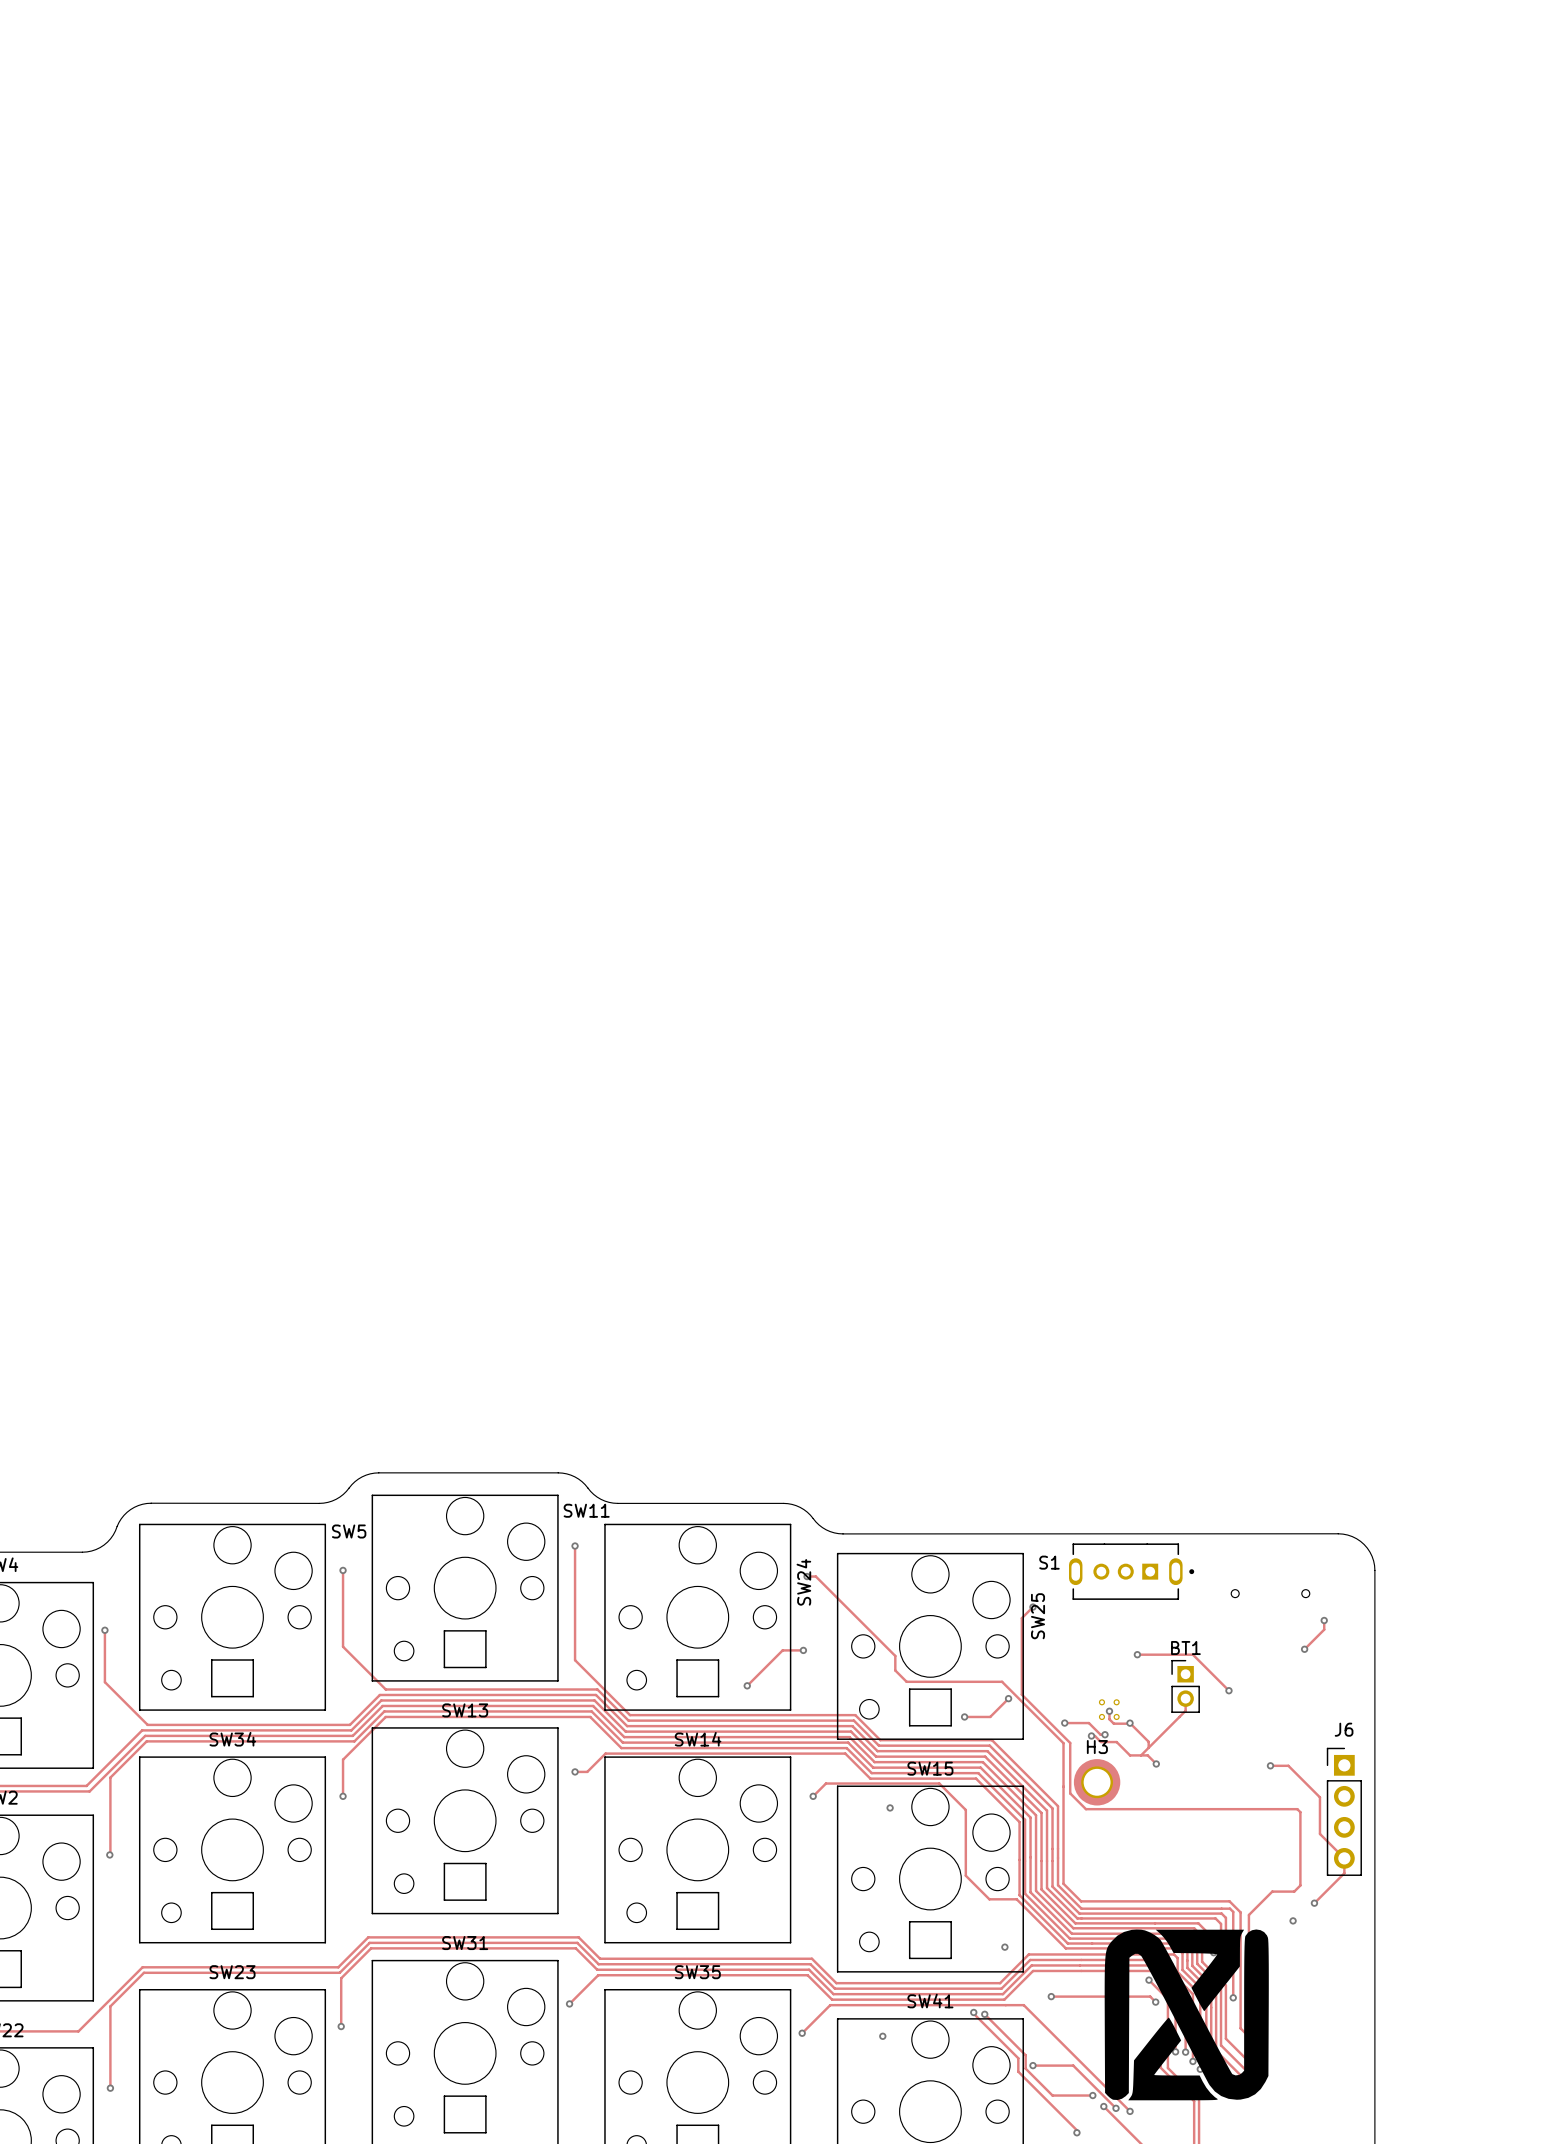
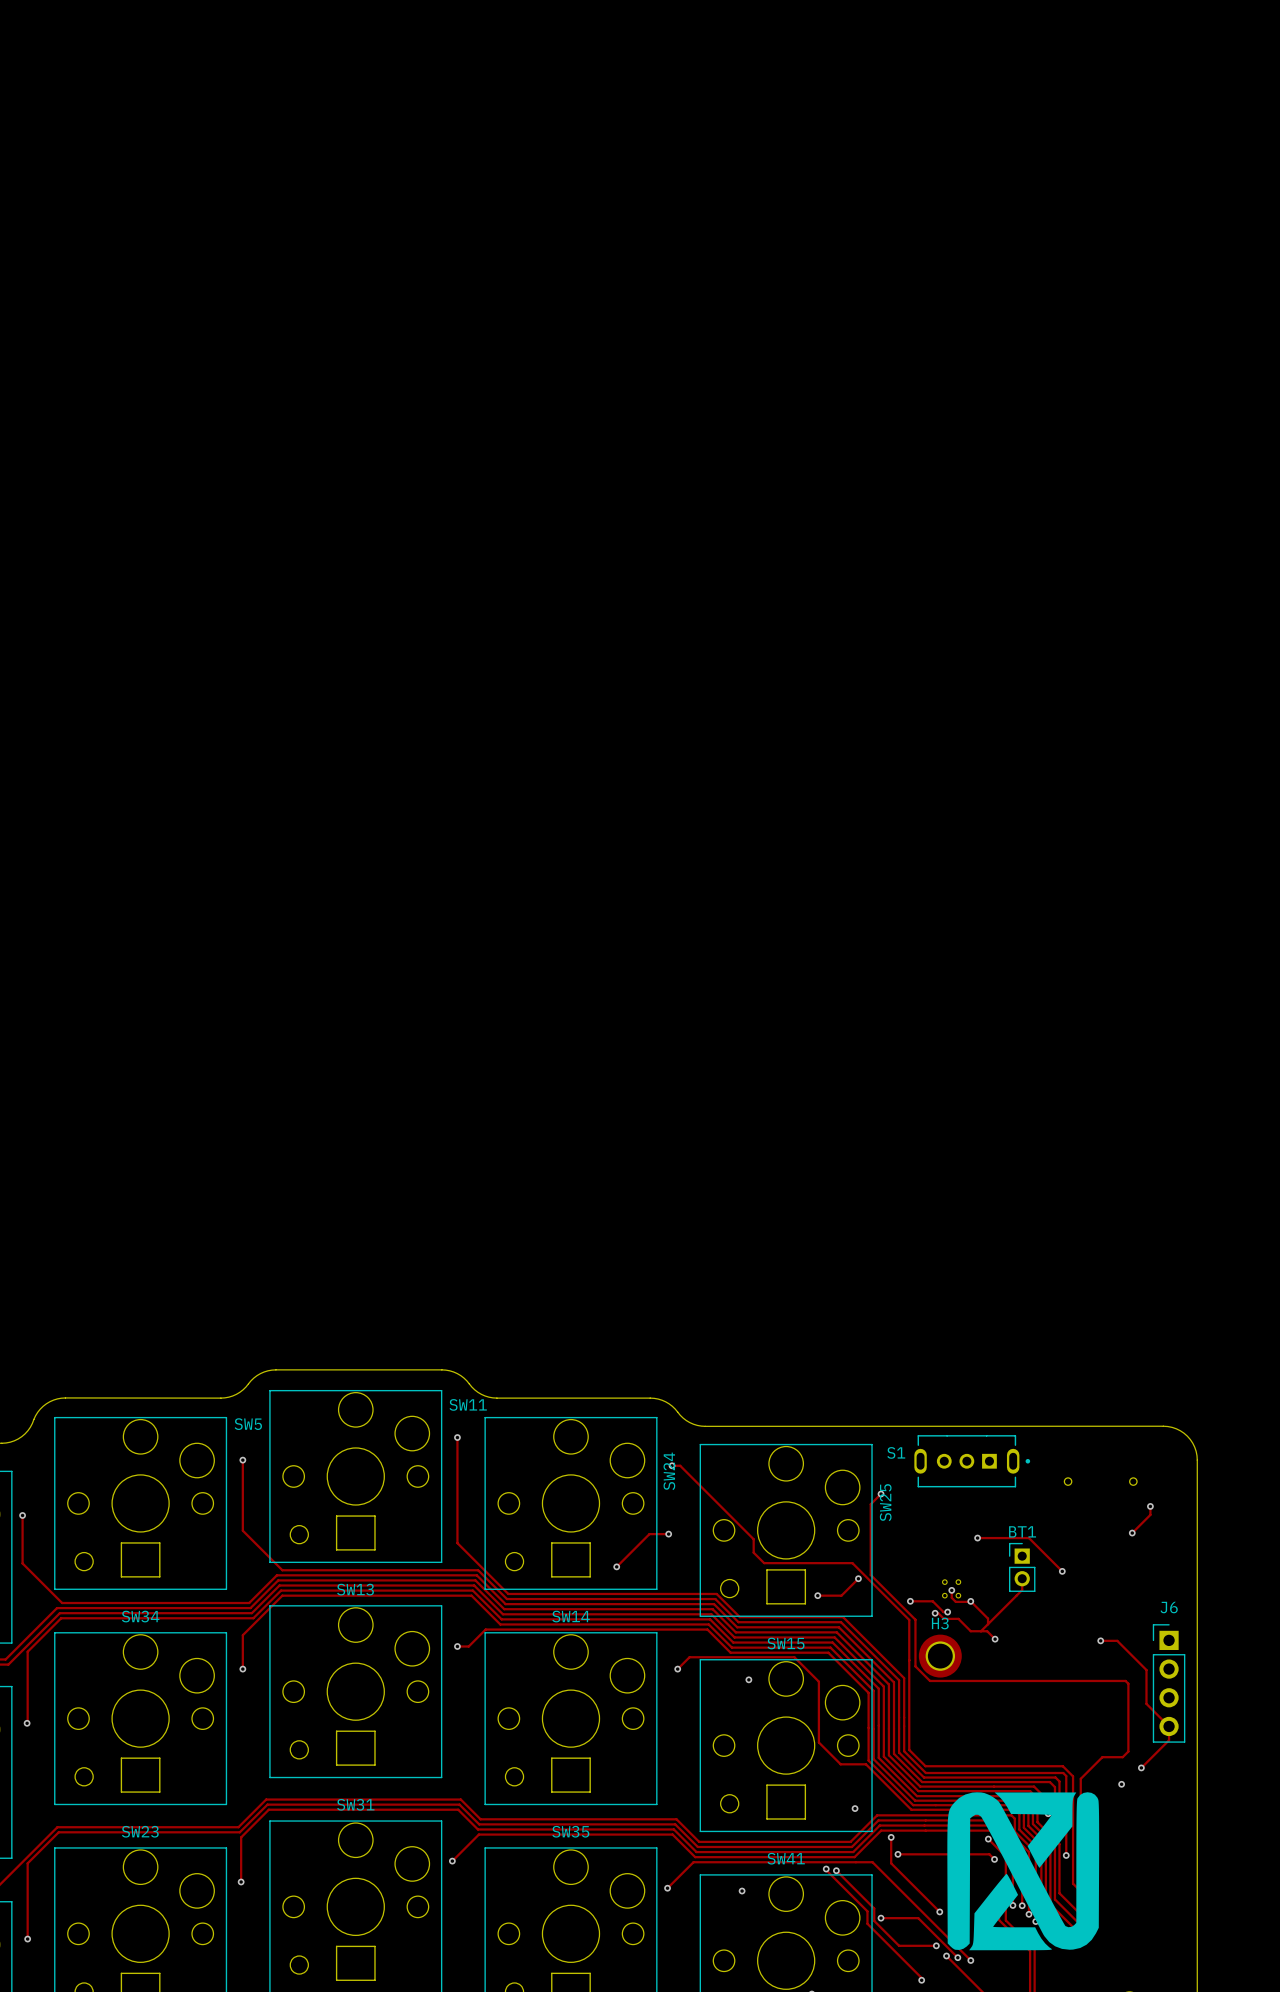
track: none -> (891, 1837) (891, 1863) (939, 1911)
via: none -> (891, 1837)
via: none -> (939, 1911)

